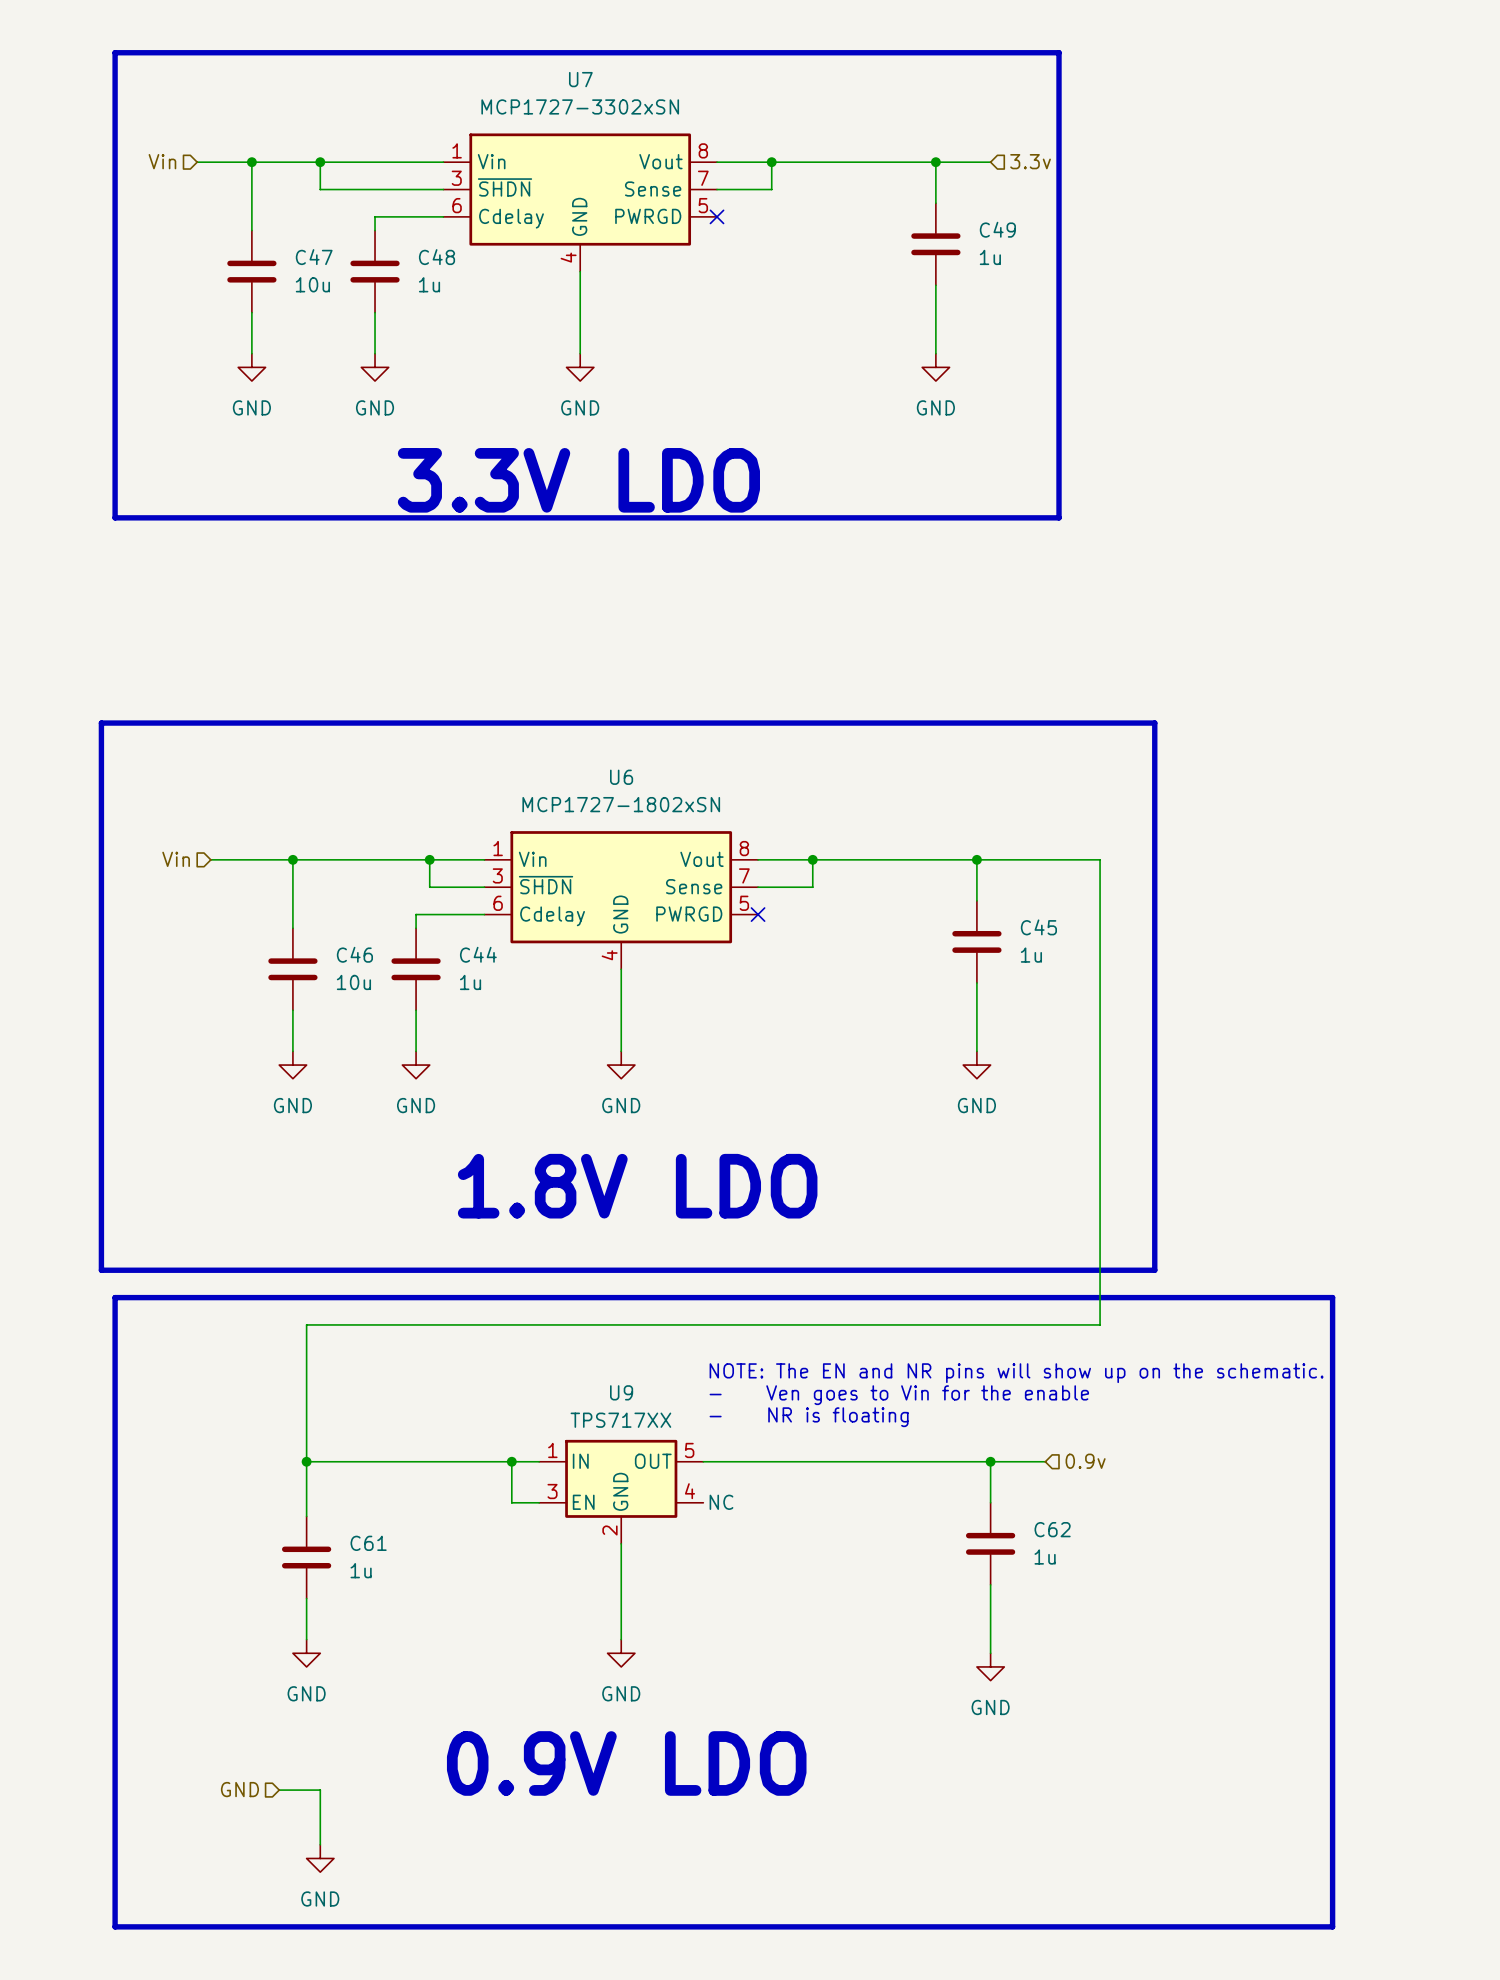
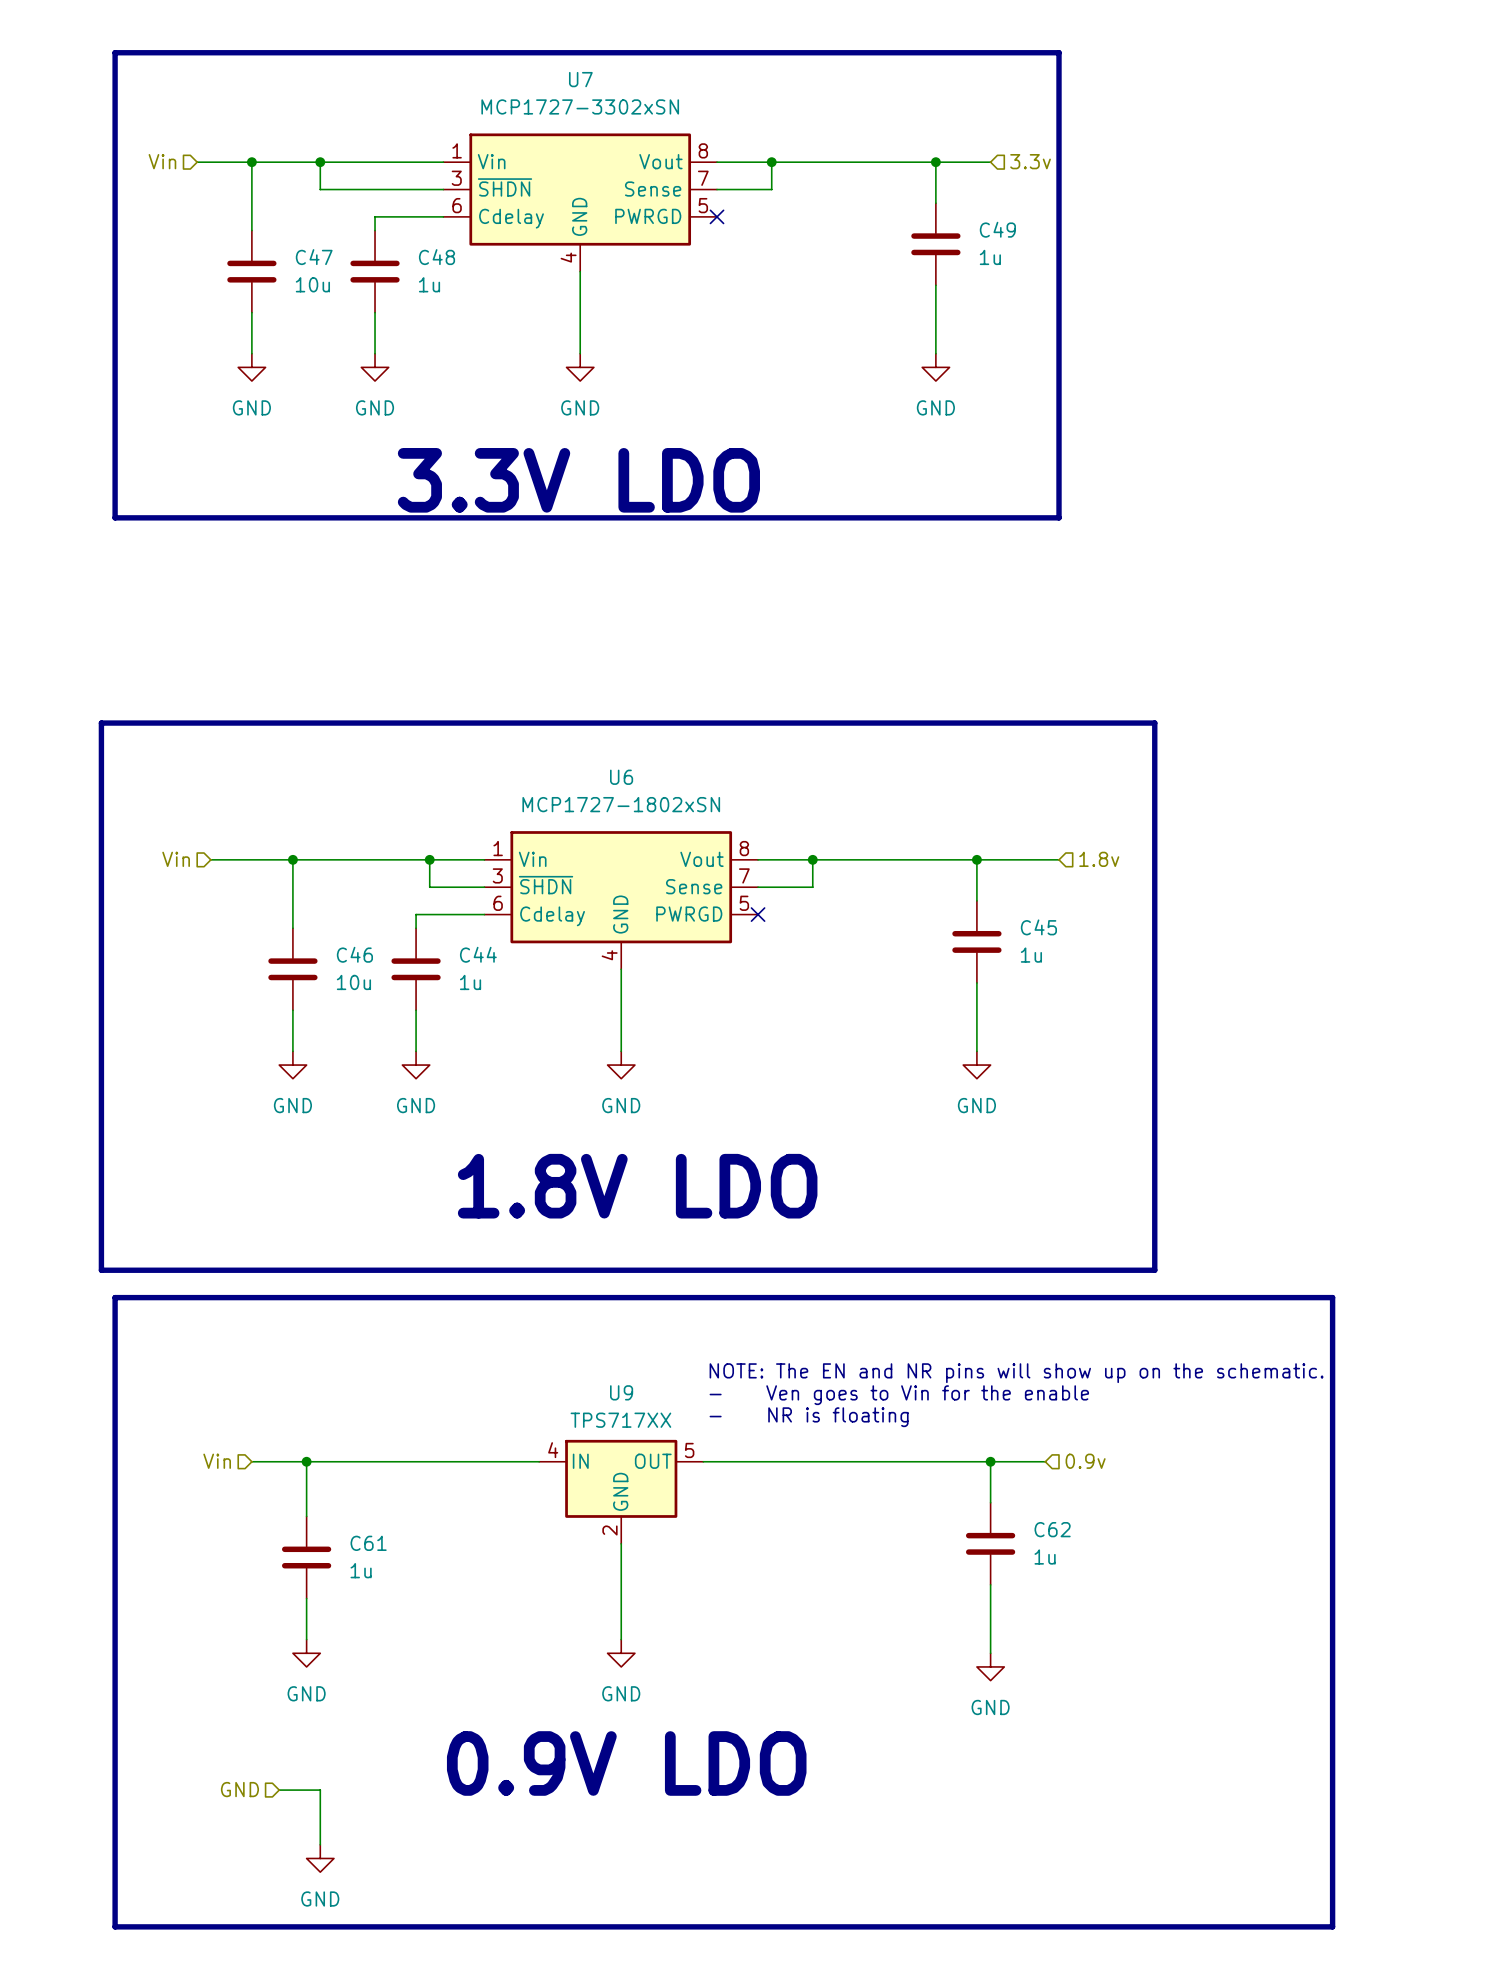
wire: (1059, 859) (1100, 859) (1100, 1324) (306, 1324) (306, 1461) -> (251, 1461) (306, 1461)
hierarchical label: none -> 1.8v (1099, 859)
U9 symbol: [539, 1439, 704, 1544] -> [539, 1439, 704, 1544]
hierarchical label: none -> Vin (217, 1461)
wire: (511, 1461) (511, 1502) (539, 1502) -> none
junction: (511, 1461) -> none

